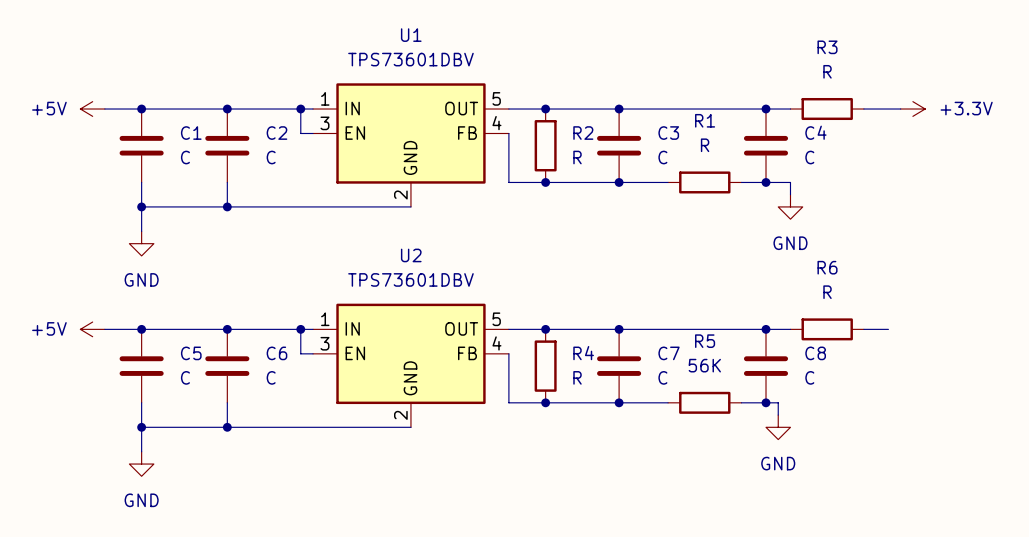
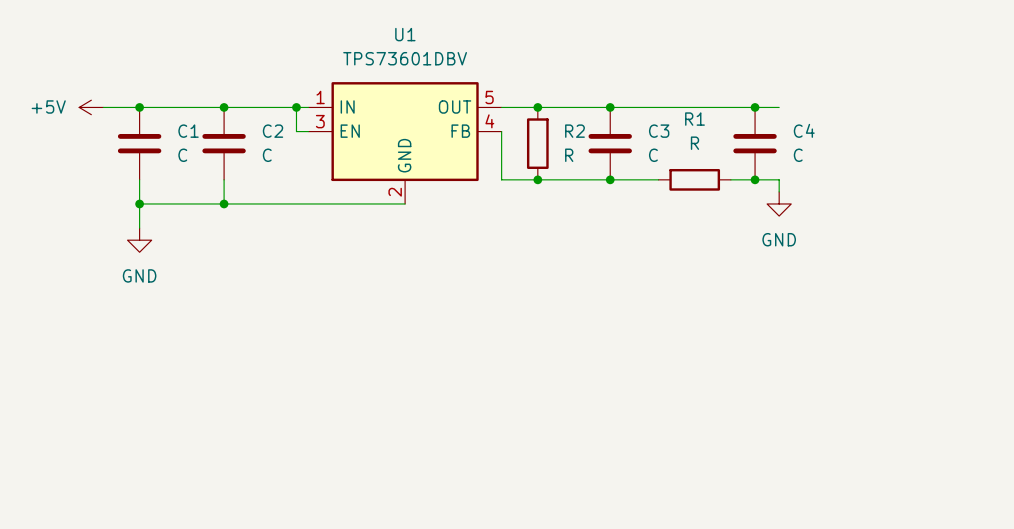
R3: R (827, 109) -> none
wire: (863, 109) (900, 109) -> none
power symbol: +3.3V (912, 109) -> none
power symbol: +5V (92, 329) -> none
wire: (104, 329) (313, 329) -> none
junction: (141, 329) -> none
junction: (227, 329) -> none
wire: (300, 329) (300, 353) (313, 353) -> none
junction: (300, 329) -> none
wire: (508, 329) (790, 329) -> none
junction: (545, 329) -> none
junction: (619, 329) -> none
junction: (766, 329) -> none
R6: R (827, 329) -> none
wire: (863, 329) (888, 329) -> none
wire: (508, 353) (508, 402) (668, 402) -> none
U2: TPS73601DBV (410, 365) -> none
C5: C (141, 366) -> none
C6: C (227, 366) -> none
R4: R (545, 366) -> none
C7: C (619, 366) -> none
C8: C (766, 366) -> none
wire: (141, 402) (141, 451) -> none
wire: (227, 402) (227, 427) -> none
junction: (545, 402) -> none
junction: (619, 402) -> none
R5: 56K (704, 402) -> none
wire: (741, 402) (778, 402) (778, 415) -> none
junction: (766, 402) -> none
wire: (141, 427) (410, 427) -> none
junction: (141, 427) -> none
junction: (227, 427) -> none
power symbol: GND (778, 427) -> none
power symbol: GND (141, 464) -> none

